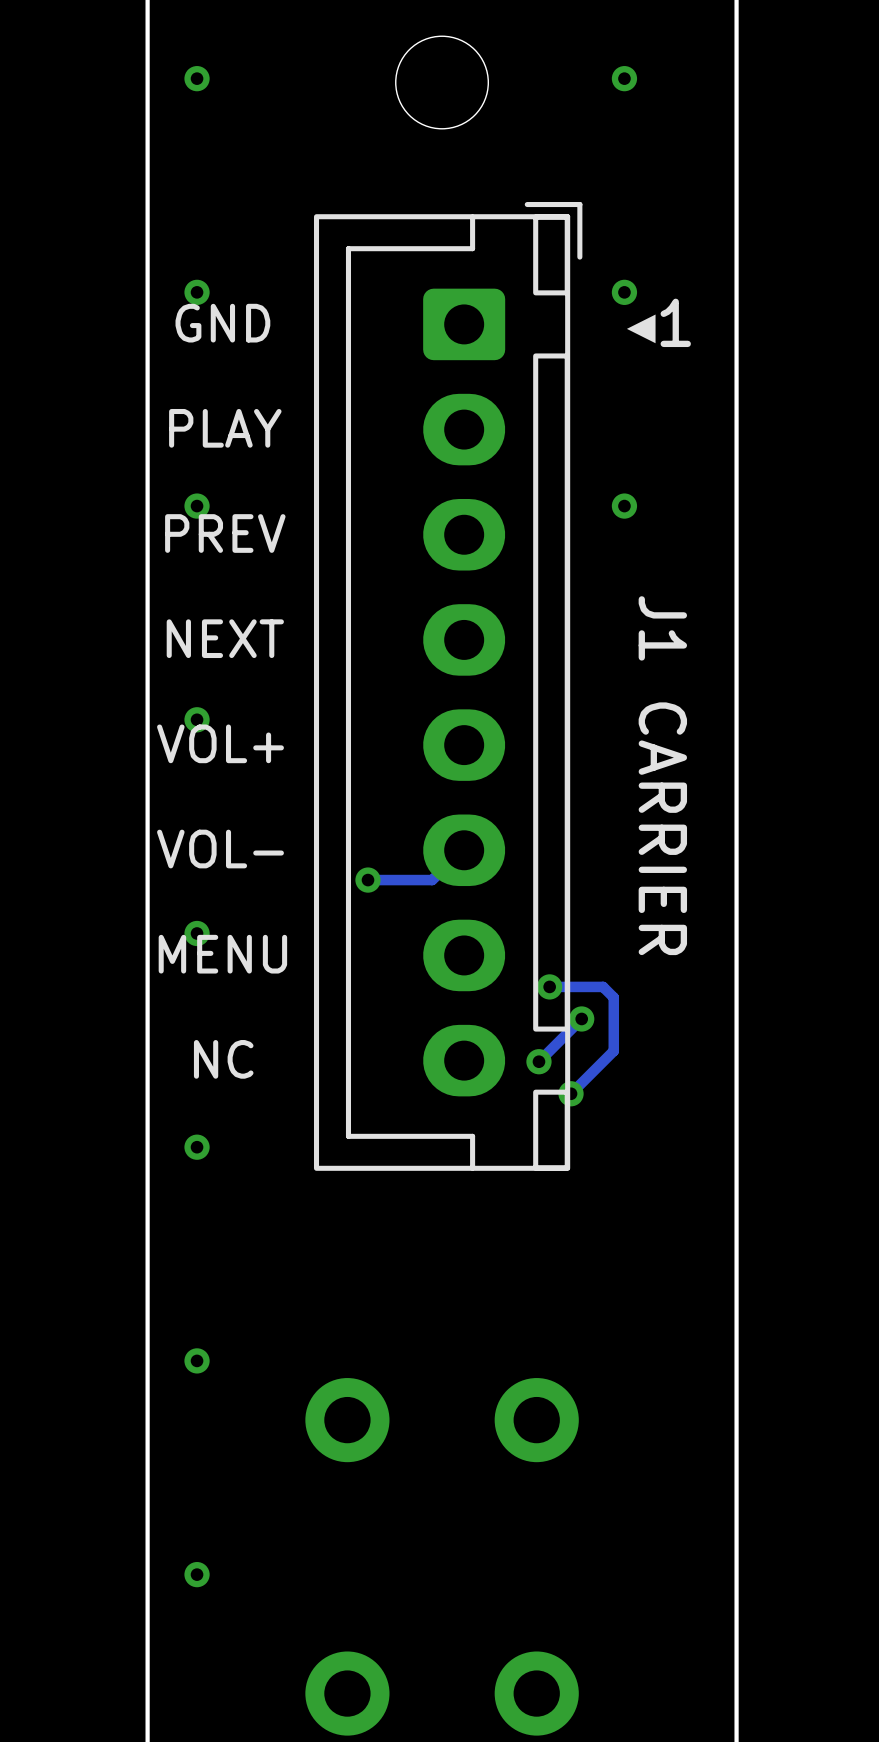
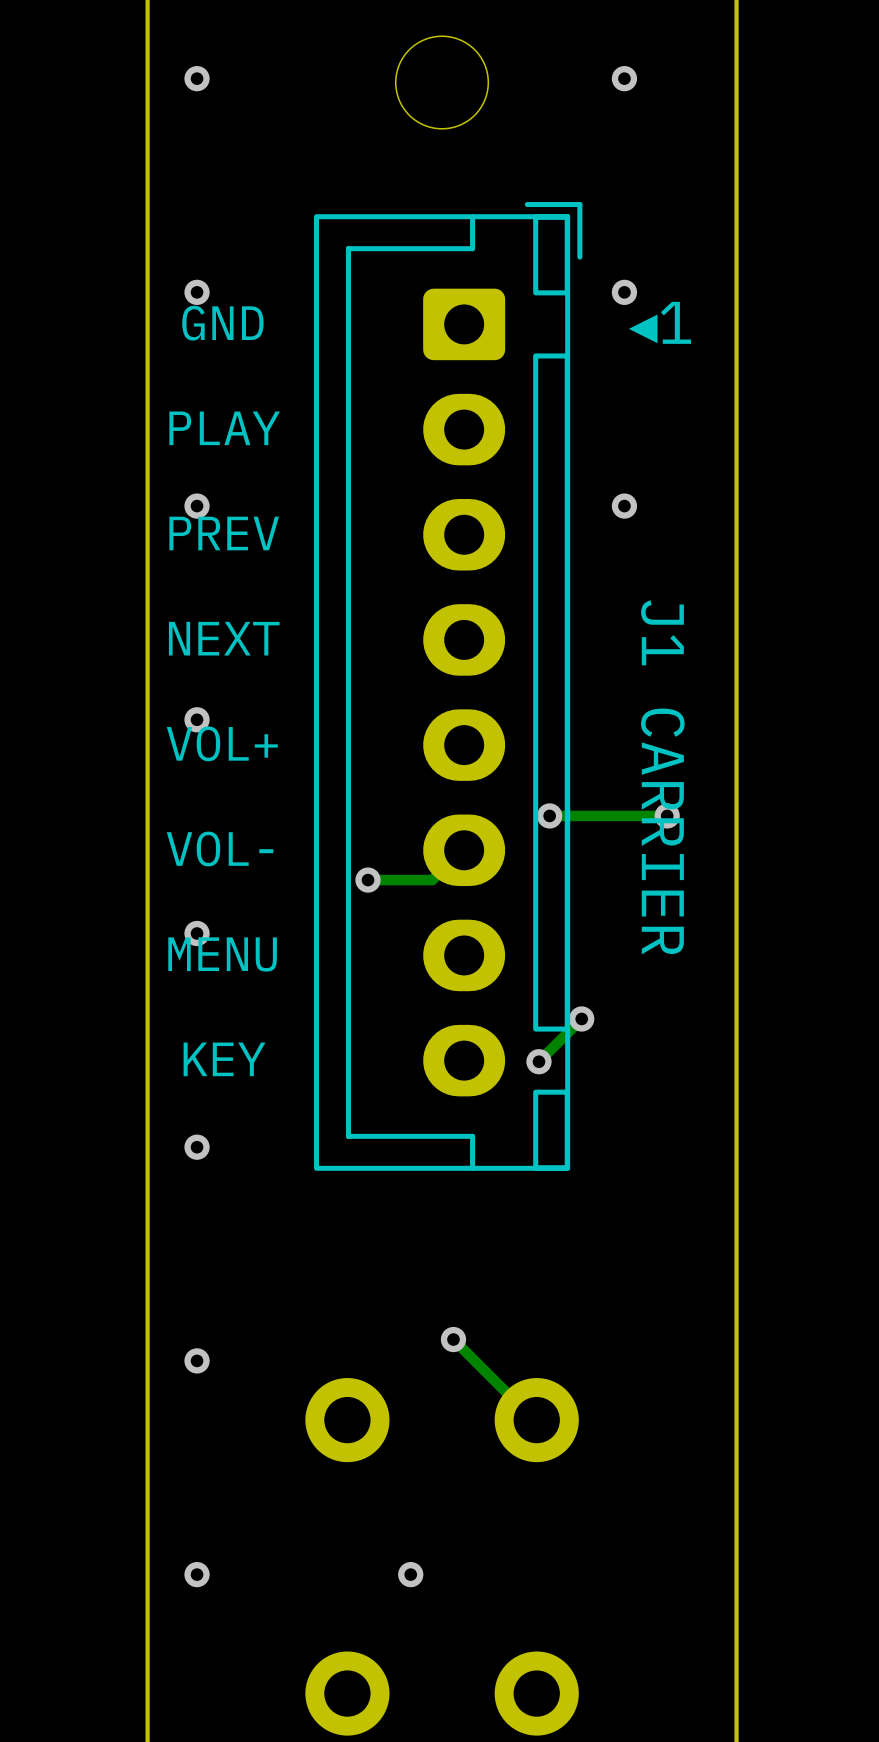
via: none -> (549, 815)
track: none -> (667, 815) (549, 815)
via: none -> (667, 815)
track: (549, 986) (603, 986) (613, 997) (613, 1051) (571, 1093) -> none
via: (549, 986) -> none
text: NC (223, 1059) -> KEY (224, 1059)
via: (571, 1093) -> none
track: none -> (453, 1339) (536, 1420)
via: none -> (453, 1339)
via: none -> (410, 1574)

